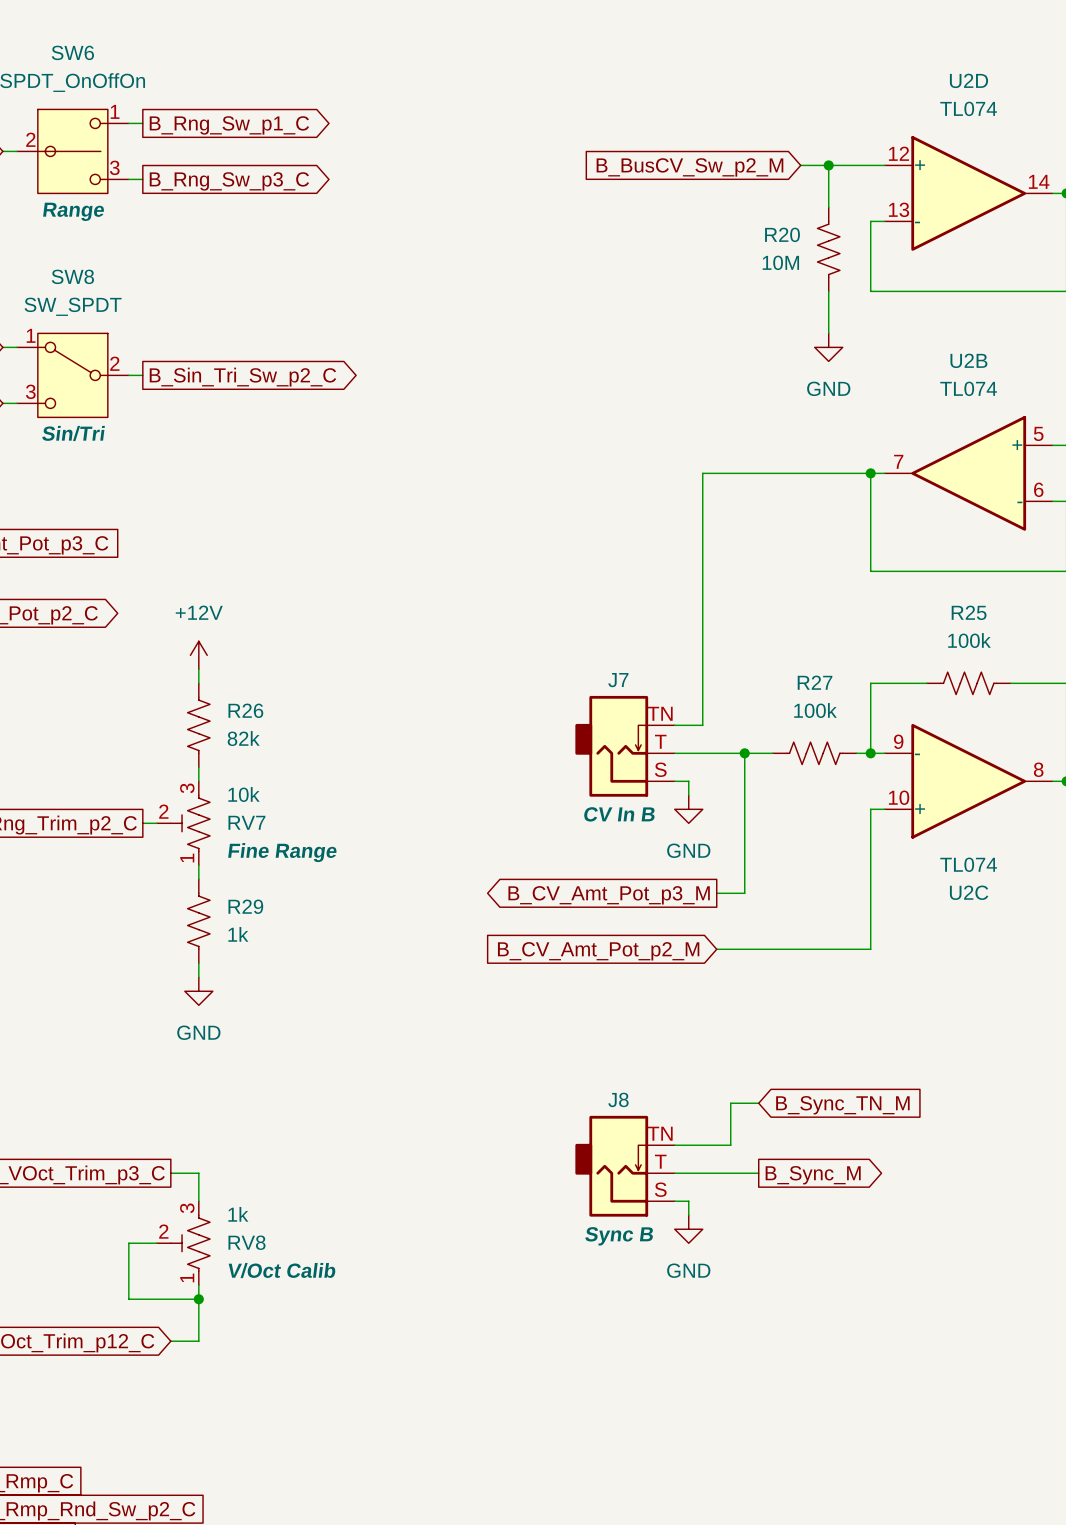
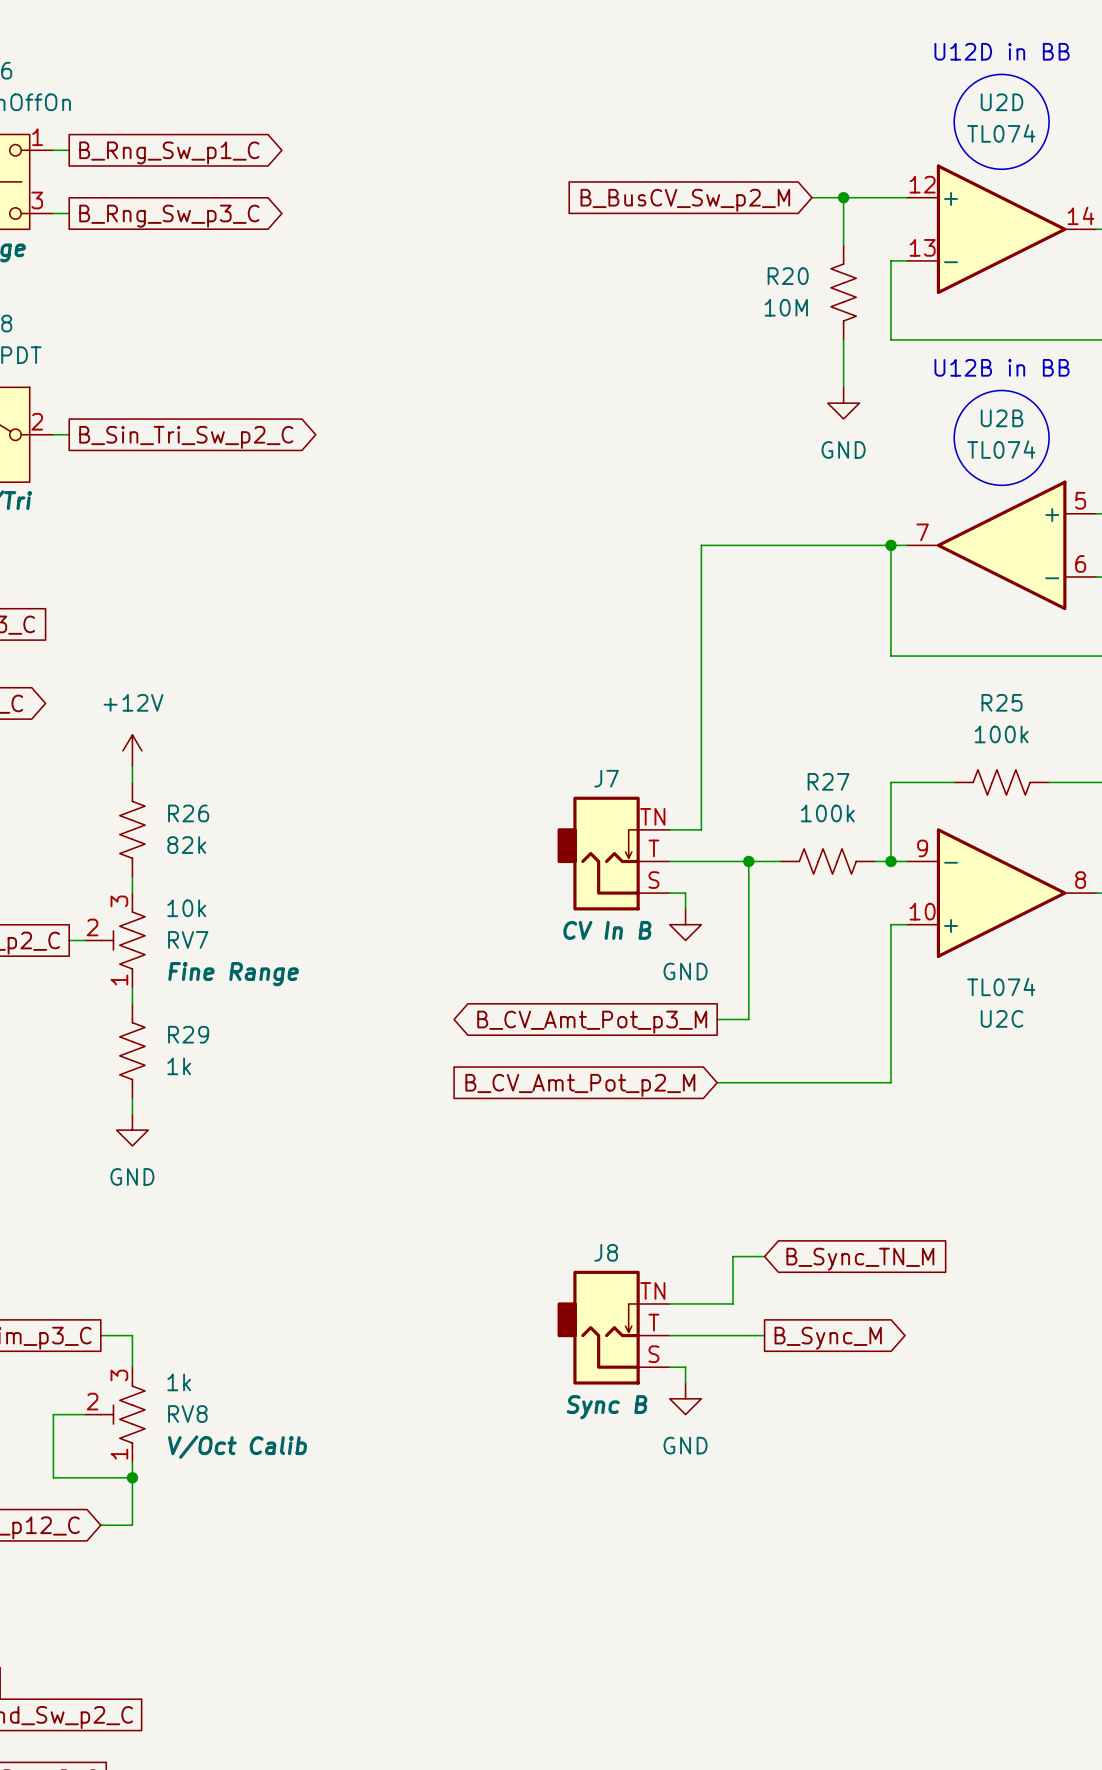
text: none -> U12D in BB (1002, 51)
drawing: none -> [954, 74, 1050, 170]
text: none -> U12B in BB (1002, 367)
drawing: none -> [954, 390, 1050, 486]

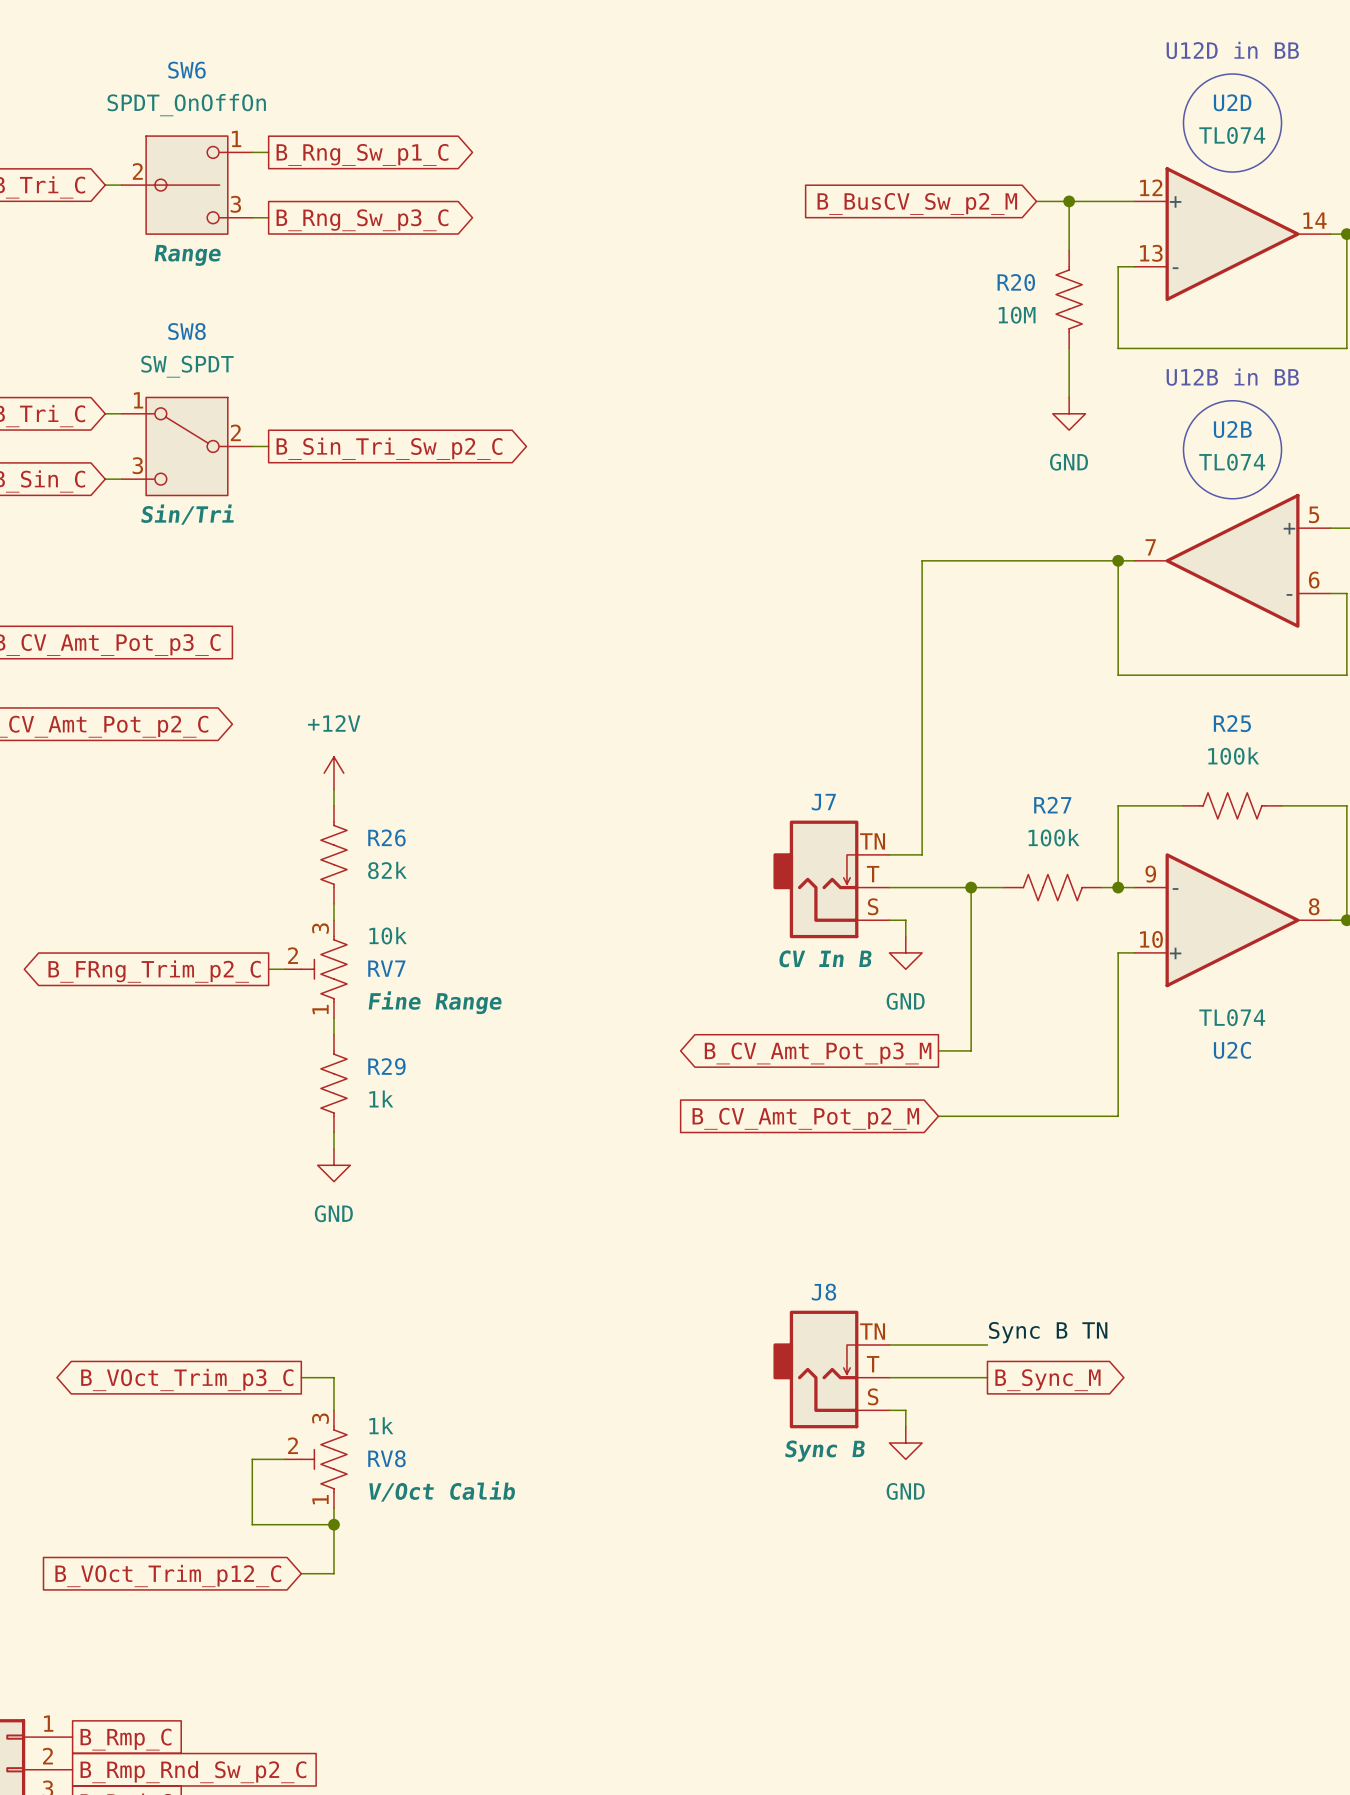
wire: (764, 1256) (732, 1256) (732, 1303) -> (987, 1345) (954, 1345)
global label: B_Sync_TN_M (860, 1259) -> none
label: none -> Sync B TN (1048, 1332)

